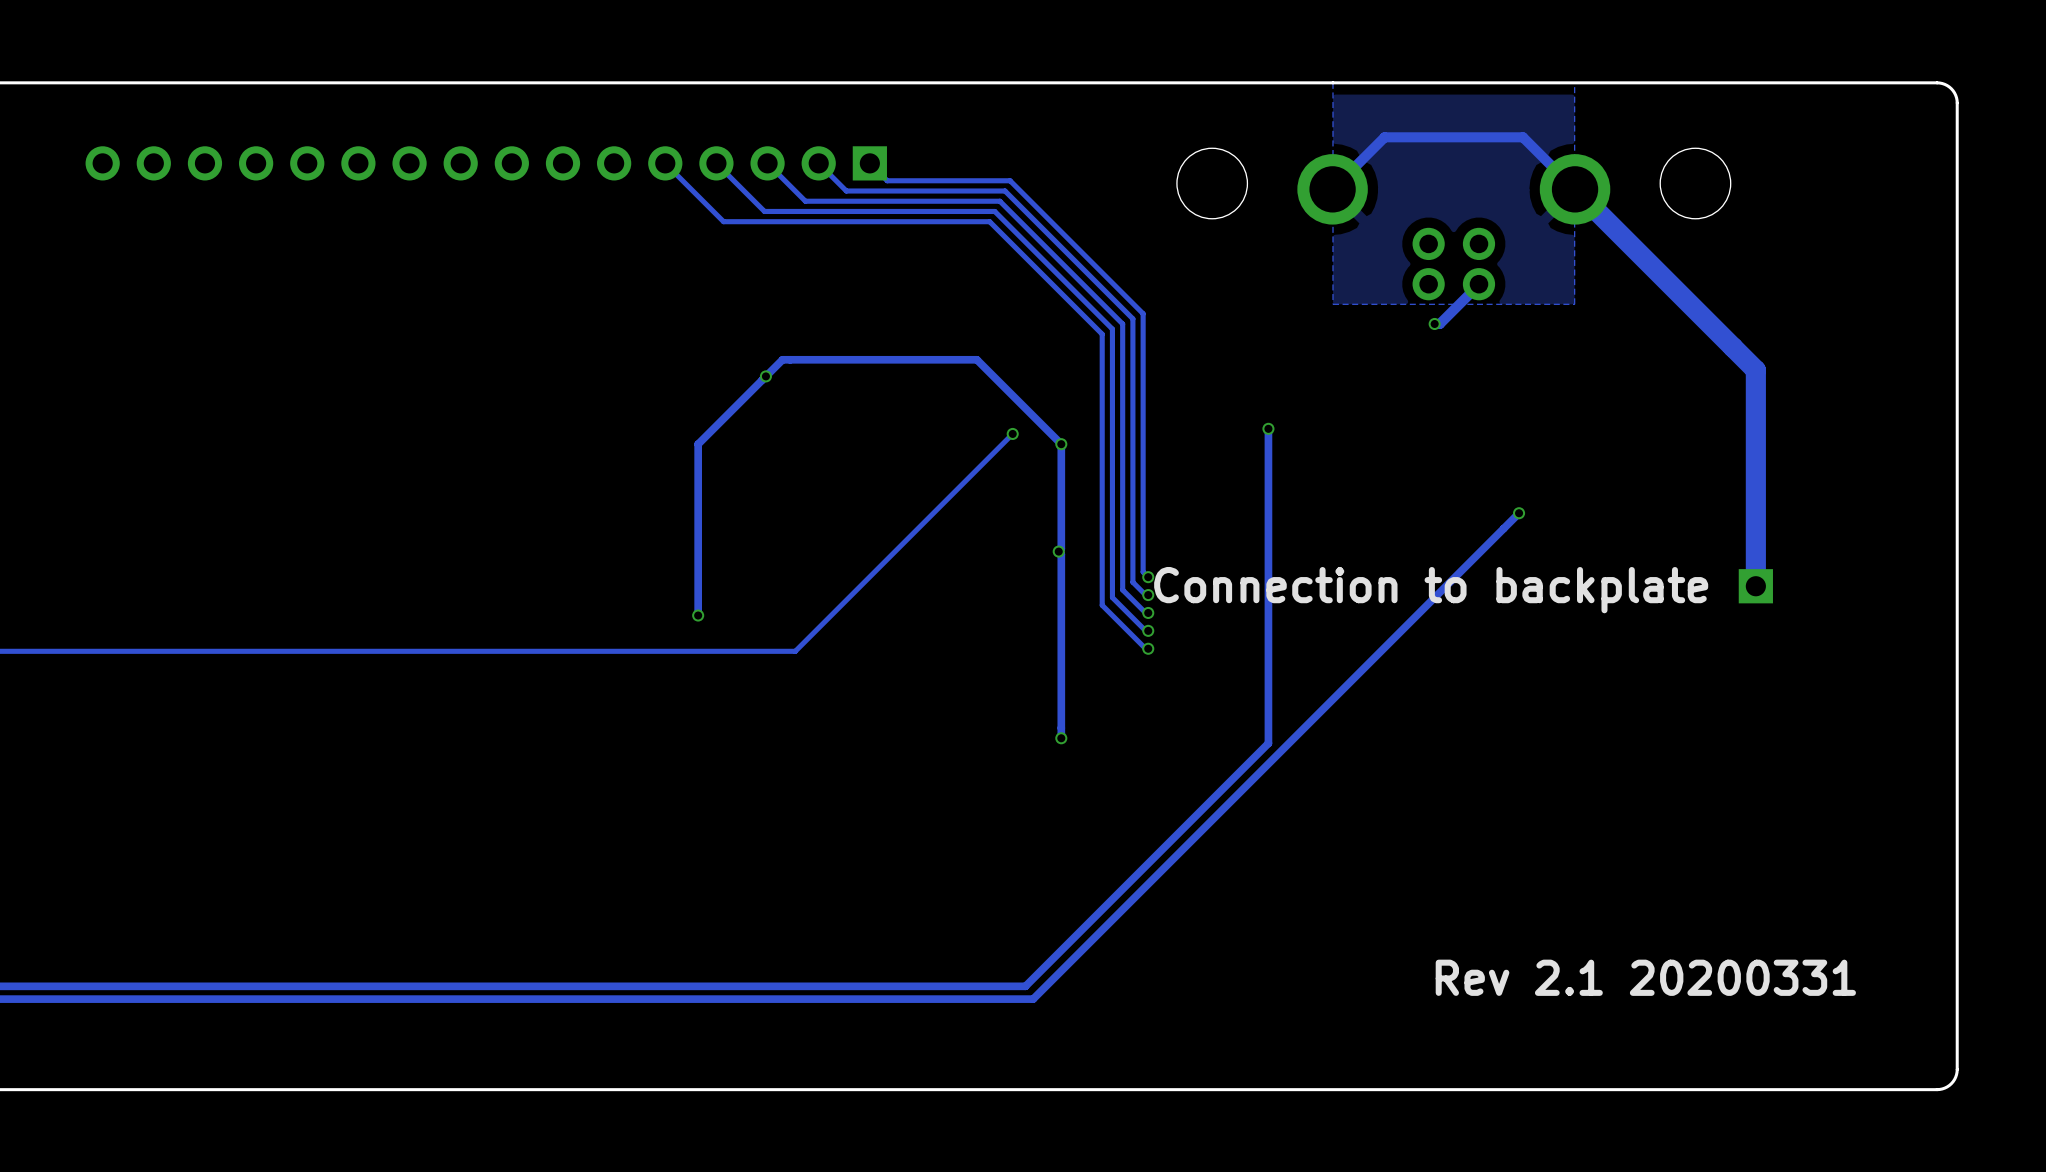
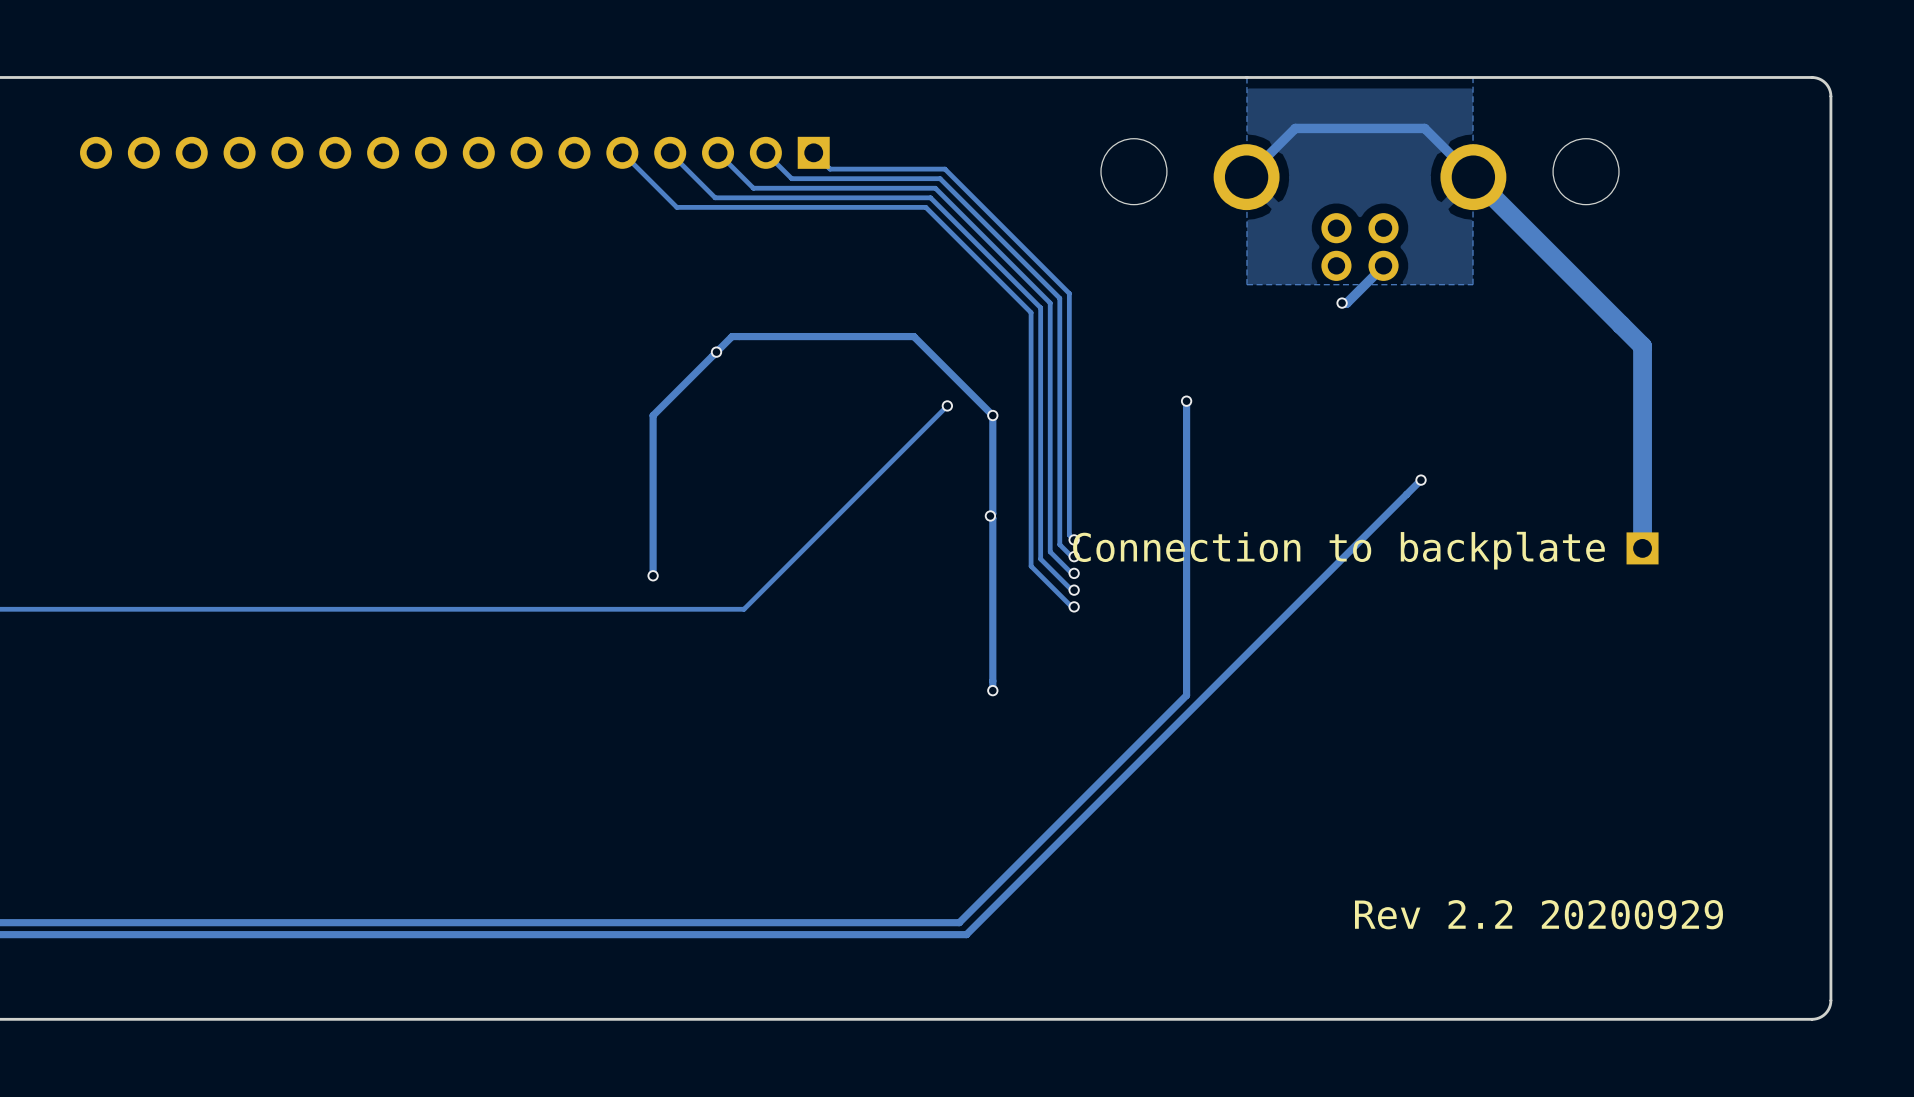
text: Rev 2.1 20200331 (1645, 977) -> Rev 2.2 20200929 (1538, 914)

